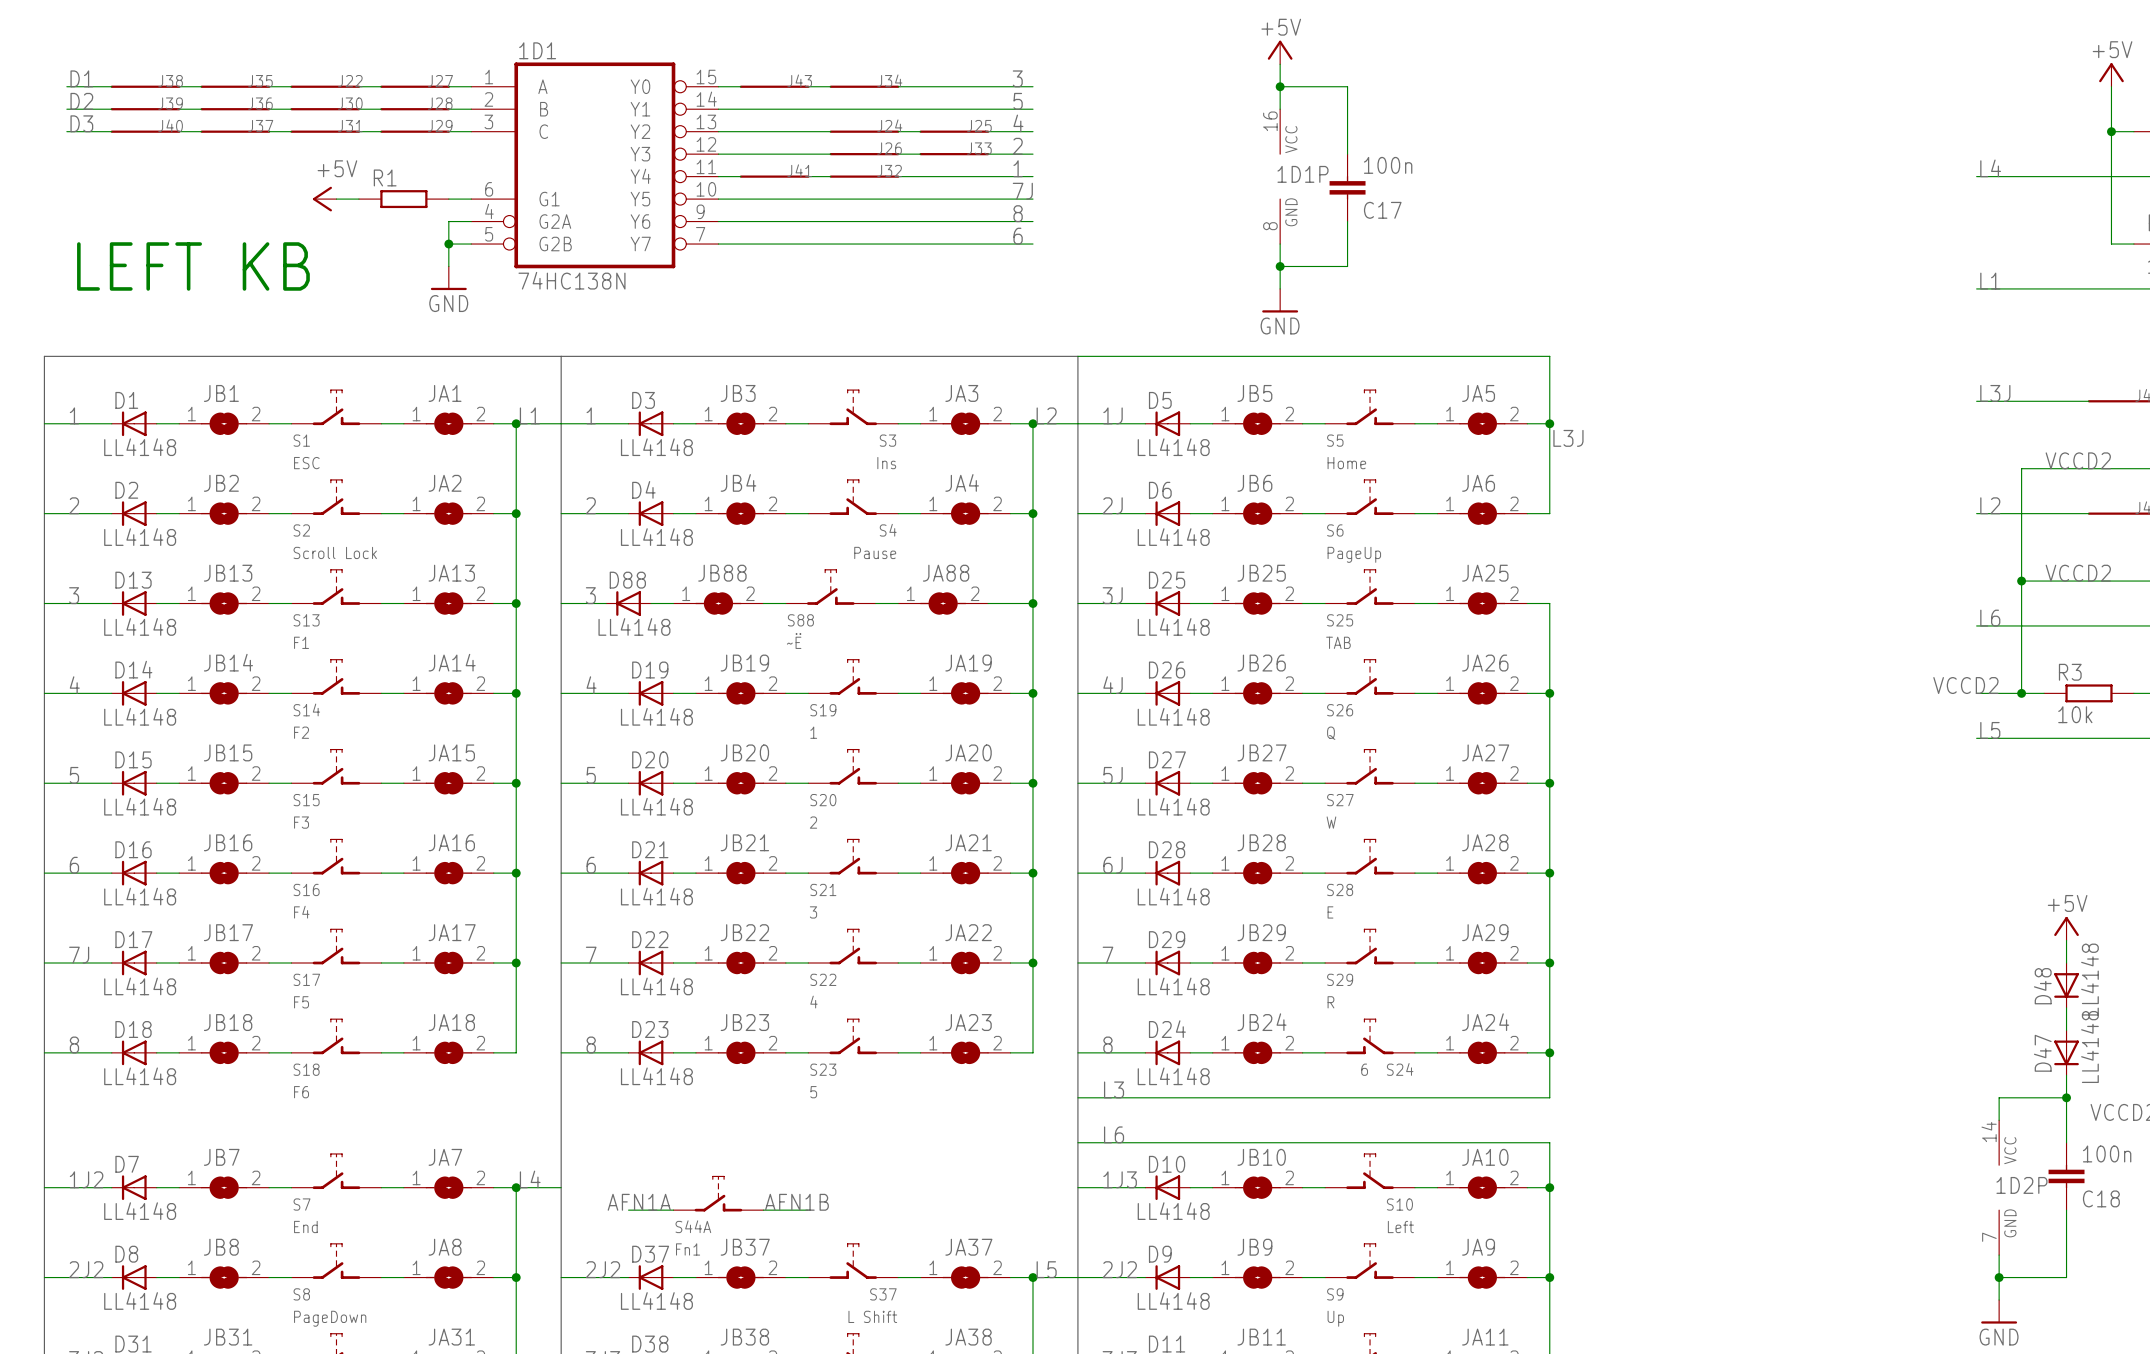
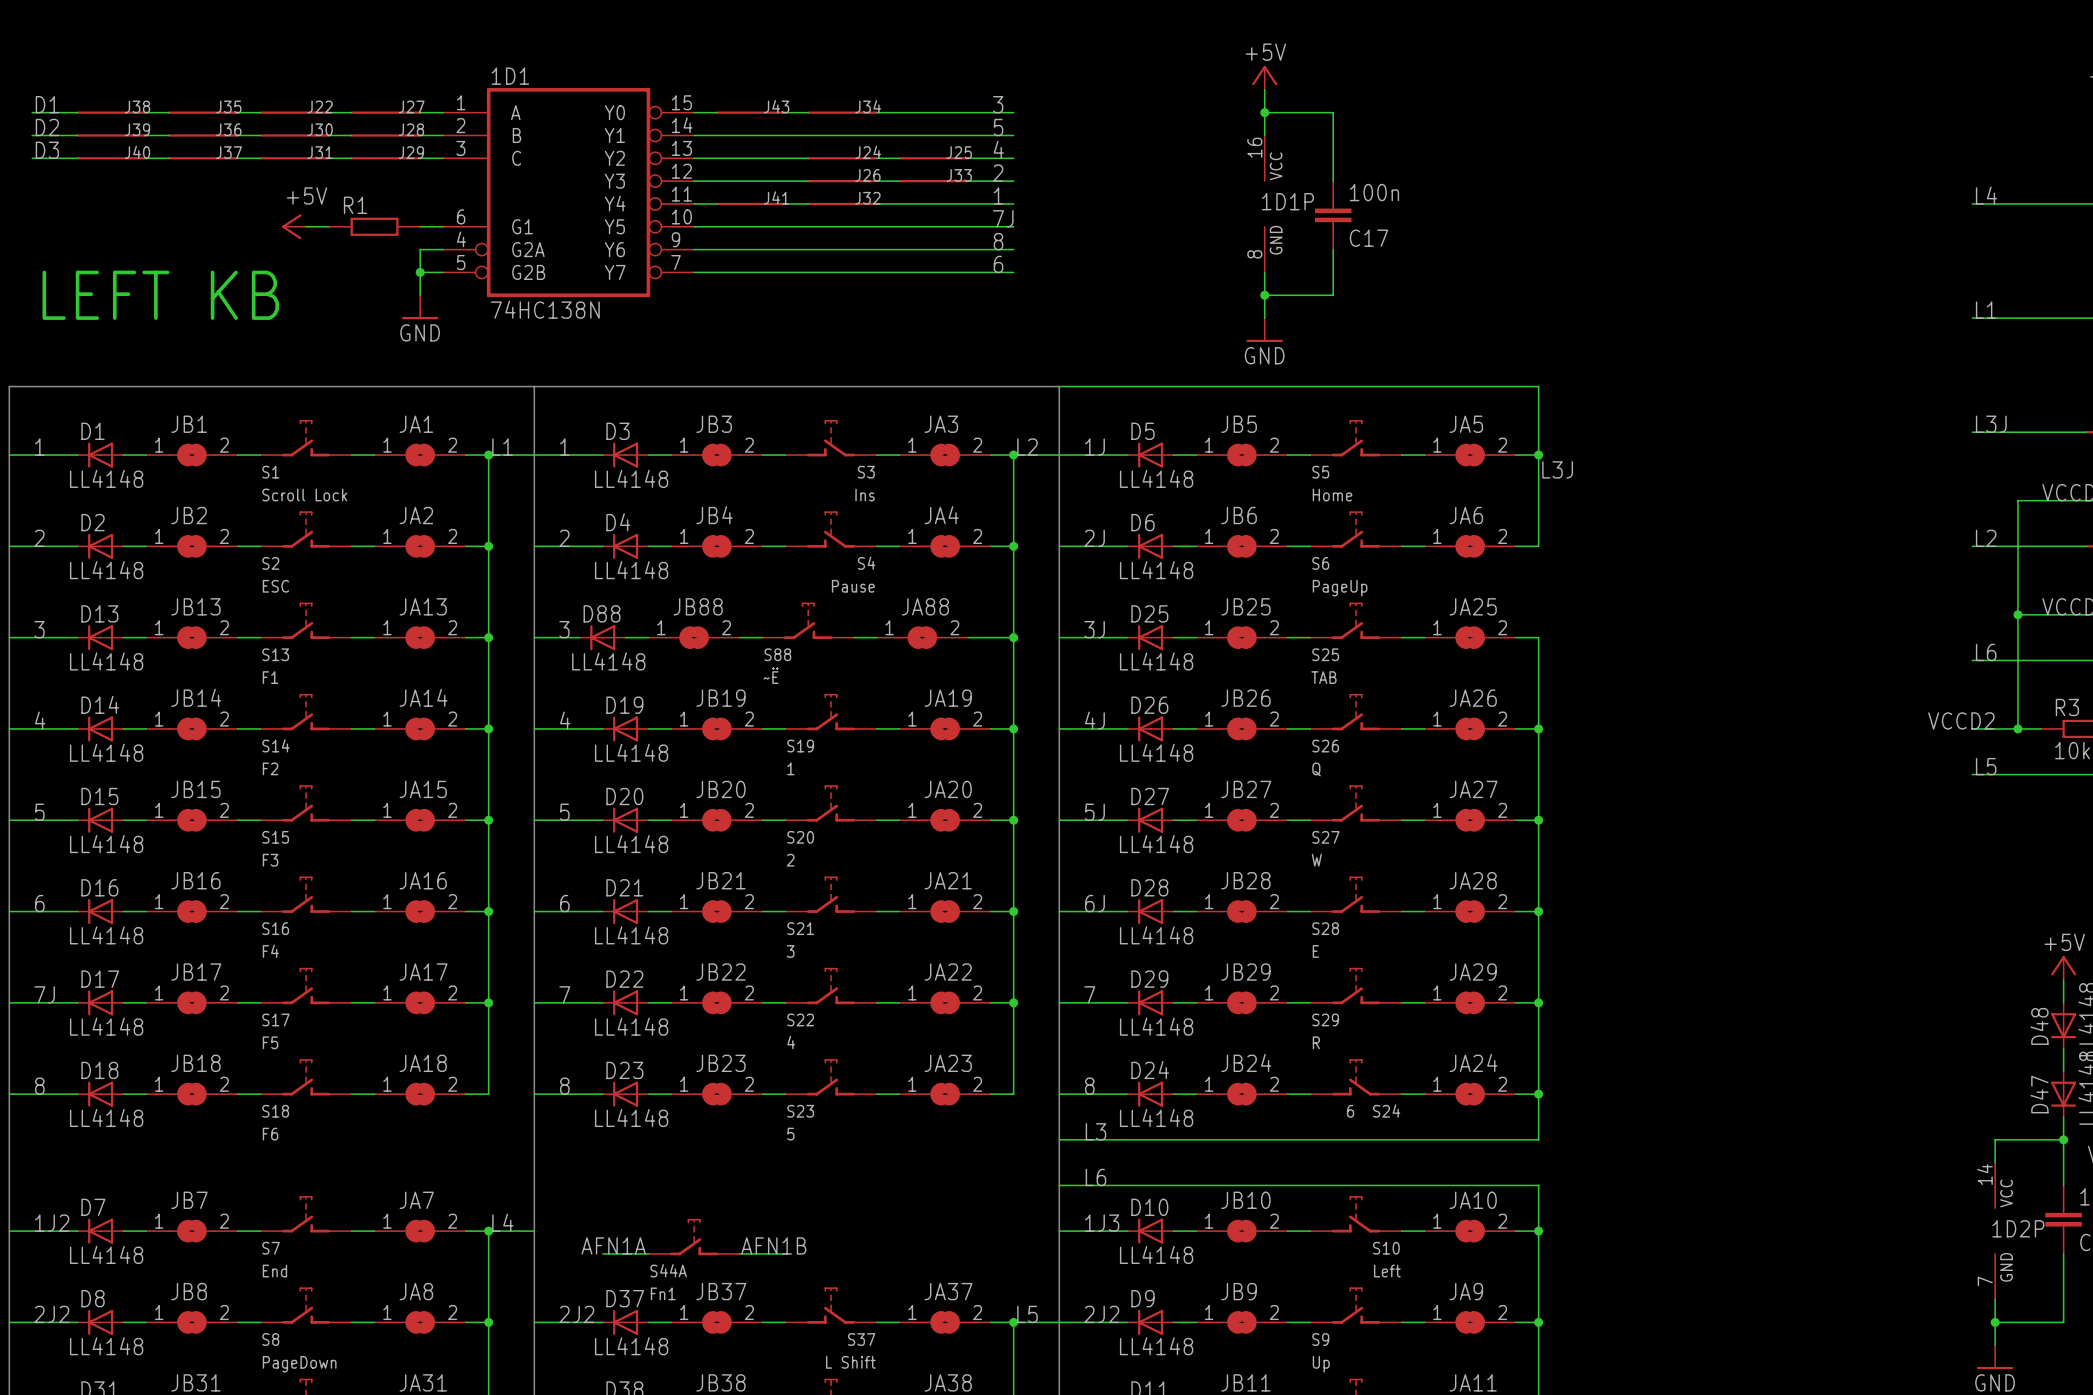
S1 value: ESC (306, 463) -> Scroll Lock (304, 494)
S2 value: Scroll Lock (335, 552) -> ESC (275, 586)

